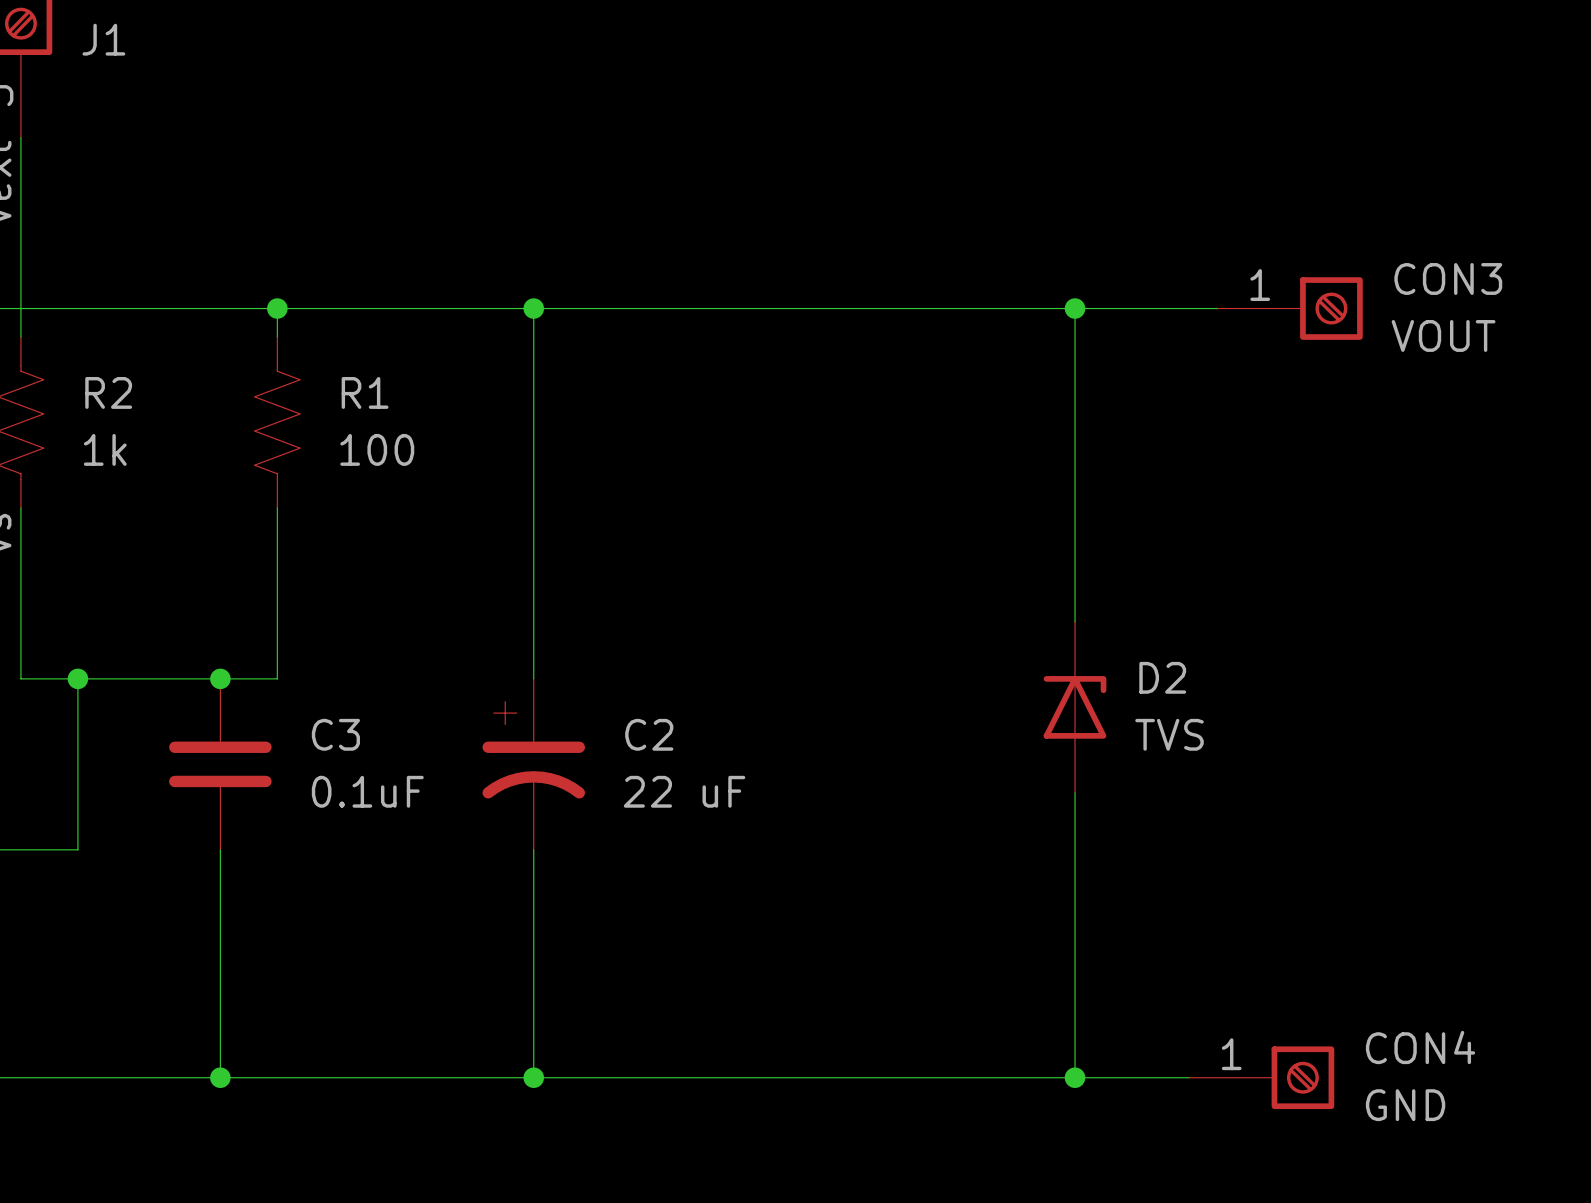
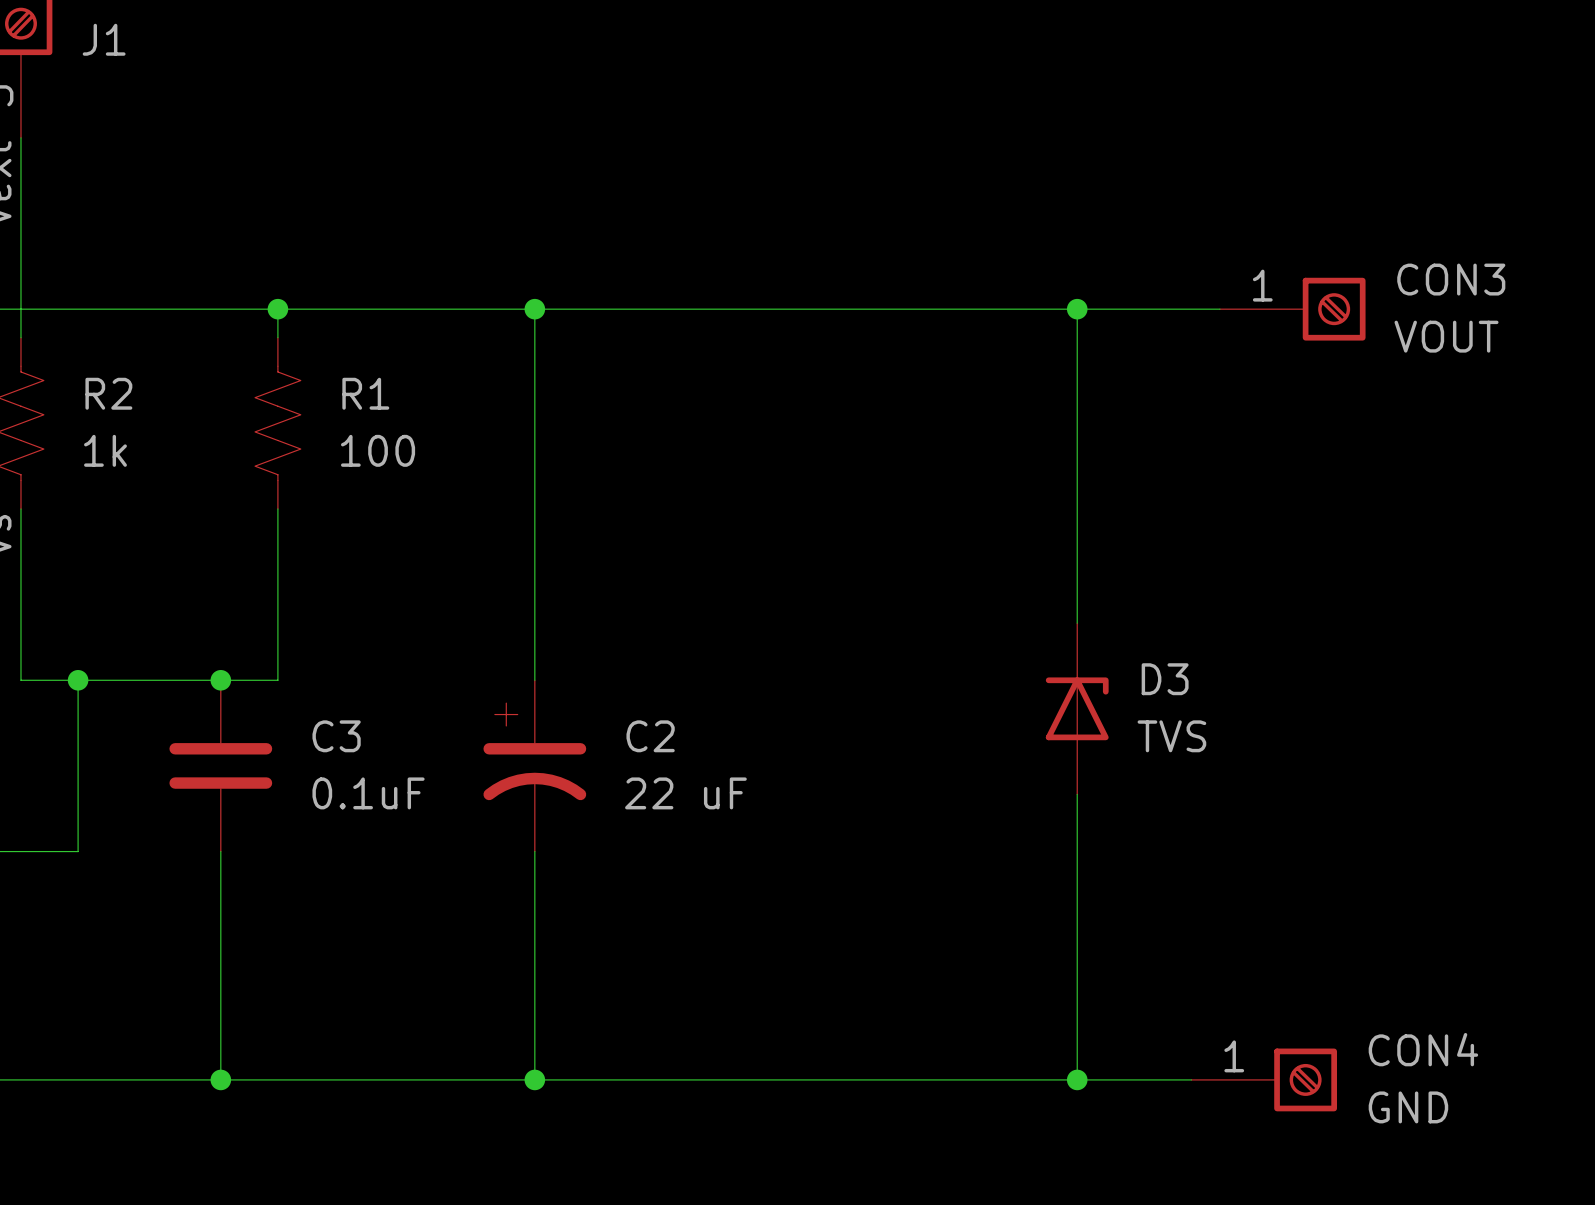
D2 name: D2 (1162, 677) -> D3 (1165, 679)

